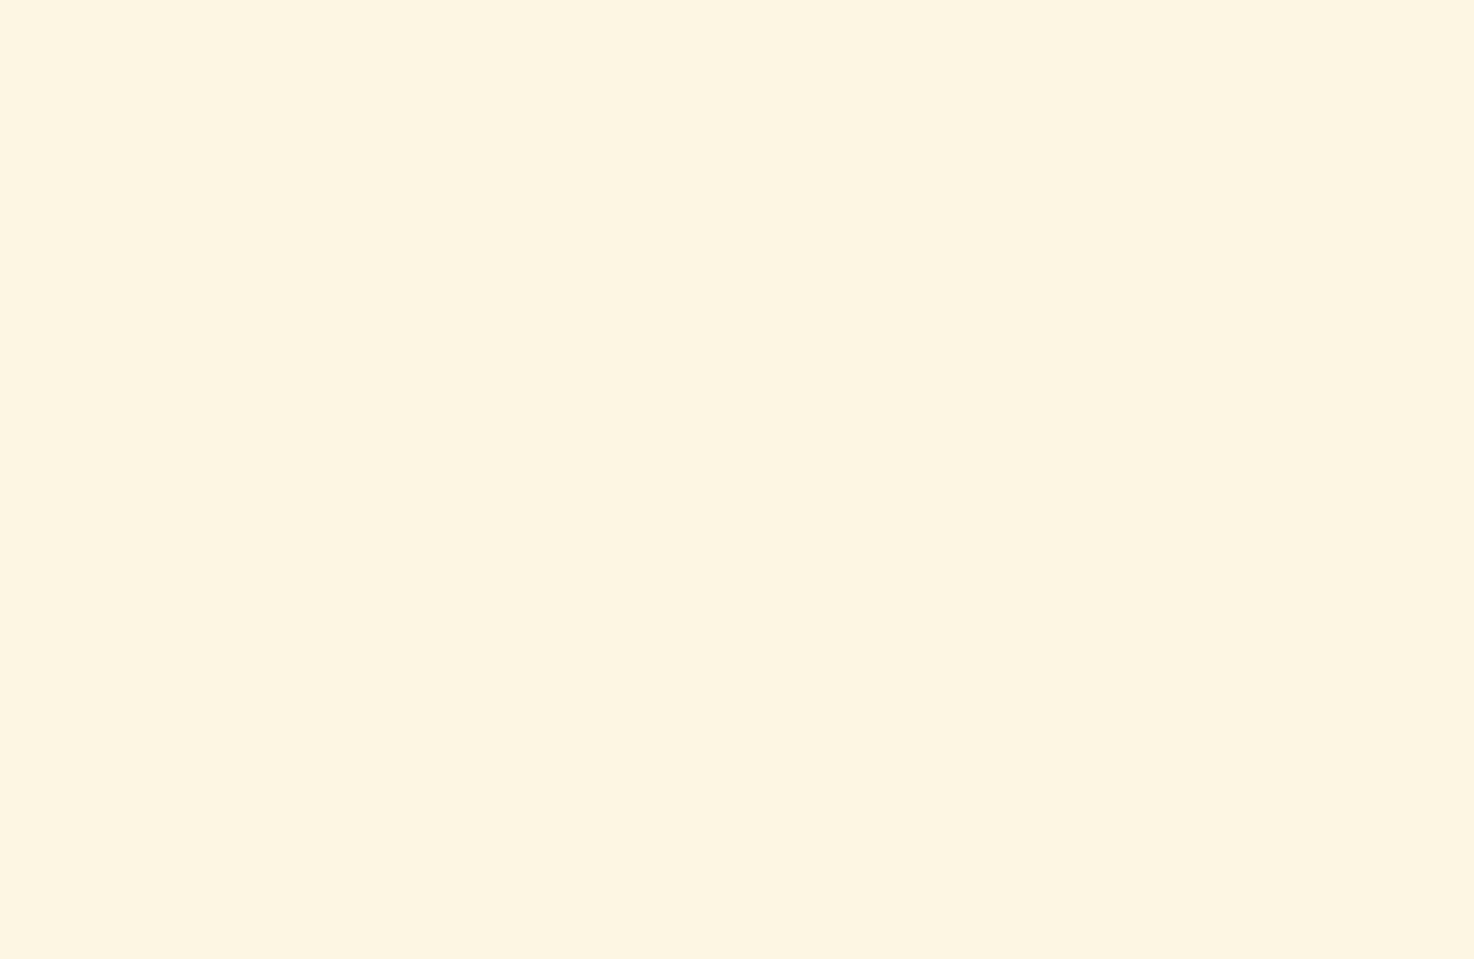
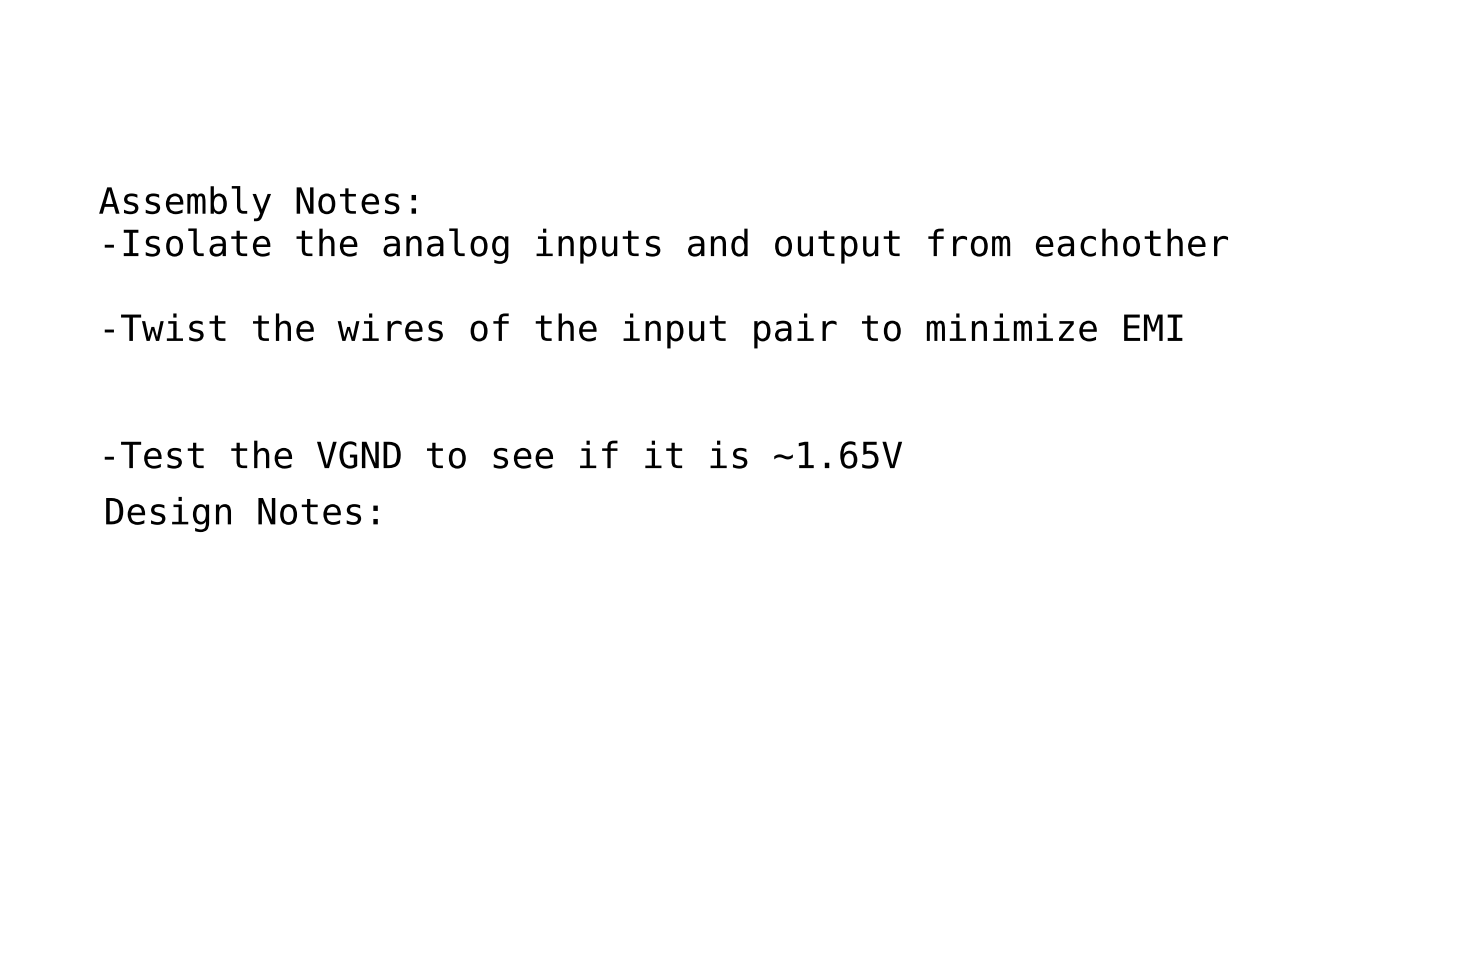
text: none -> Assembly Notes: (257, 203)
text: none -> -Isolate the analog inputs and output from eachother (666, 246)
text: none -> -Twist the wires of the input pair to minimize EMI (643, 330)
text: none -> -Test the VGND to see if it is ~1.65V (503, 454)
text: none -> Design Notes: (241, 514)

